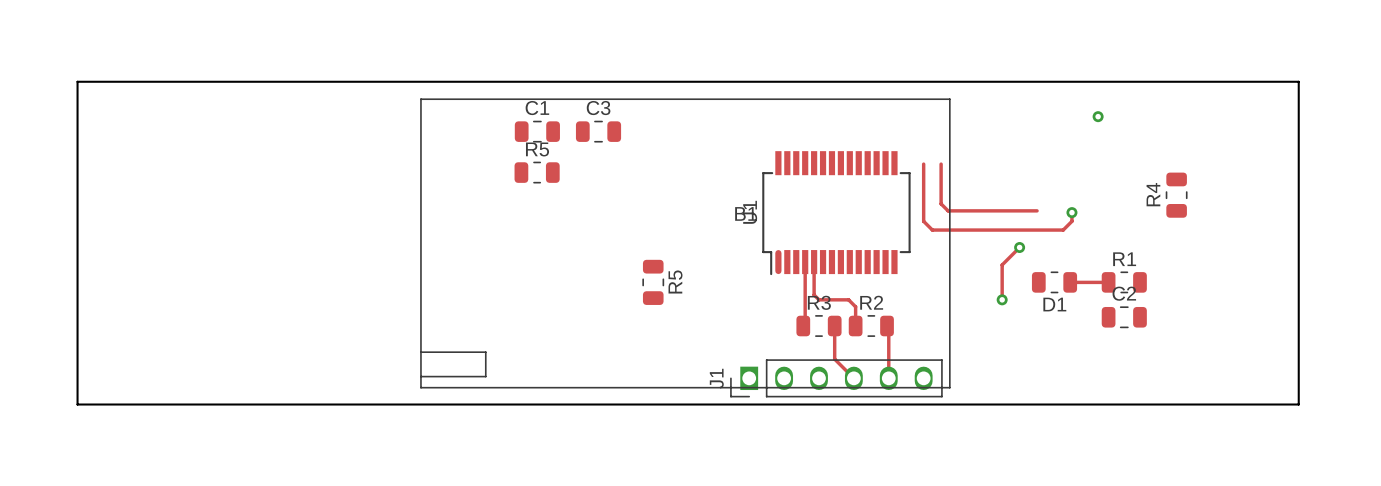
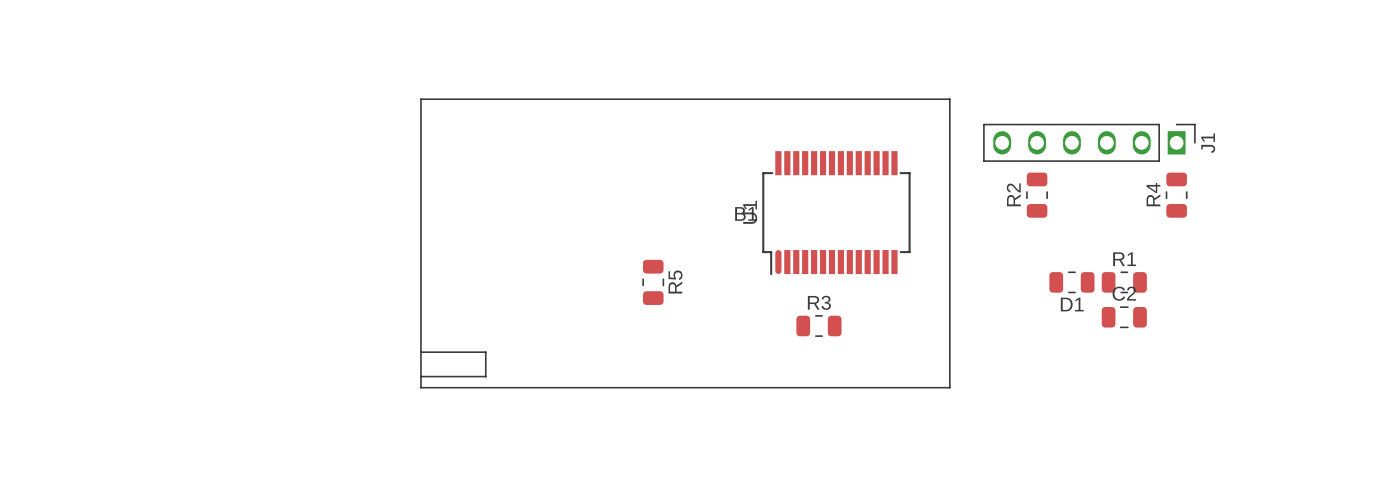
board edge: (77, 81) (1298, 81) (1298, 404) (77, 404) (77, 81) -> none
via: (1098, 116) -> none
C1: (537, 131) -> none
C3: (598, 131) -> none
track: (923, 164) (923, 221) (932, 230) (1063, 230) (1071, 221) (1071, 210) -> none
track: (941, 164) (941, 203) (948, 210) (1037, 210) -> none
R5: (537, 172) -> none
via: (1071, 212) -> none
track: (1019, 247) (1002, 264) (1002, 299) -> none
via: (1019, 247) -> none
track: (805, 262) (805, 324) (803, 326) -> none
track: (814, 262) (814, 294) (818, 299) (848, 299) (855, 306) (855, 326) -> none
D1 position: (1054, 282) -> (1071, 282)
track: (1070, 282) (1108, 282) -> none
via: (1002, 299) -> none
R2 name position: R2 (871, 302) -> R2 (1013, 194)
track: (834, 326) (834, 359) (853, 378) (853, 369) -> none
R2 rotation: 0° (871, 326) -> 90° clockwise (1037, 195)
R2 position: (871, 326) -> (1037, 195)
track: (887, 326) (888, 327) (888, 378) -> none
J1 rotation: 0° (836, 378) -> 180° (1089, 142)
J1 position: (836, 378) -> (1089, 142)

